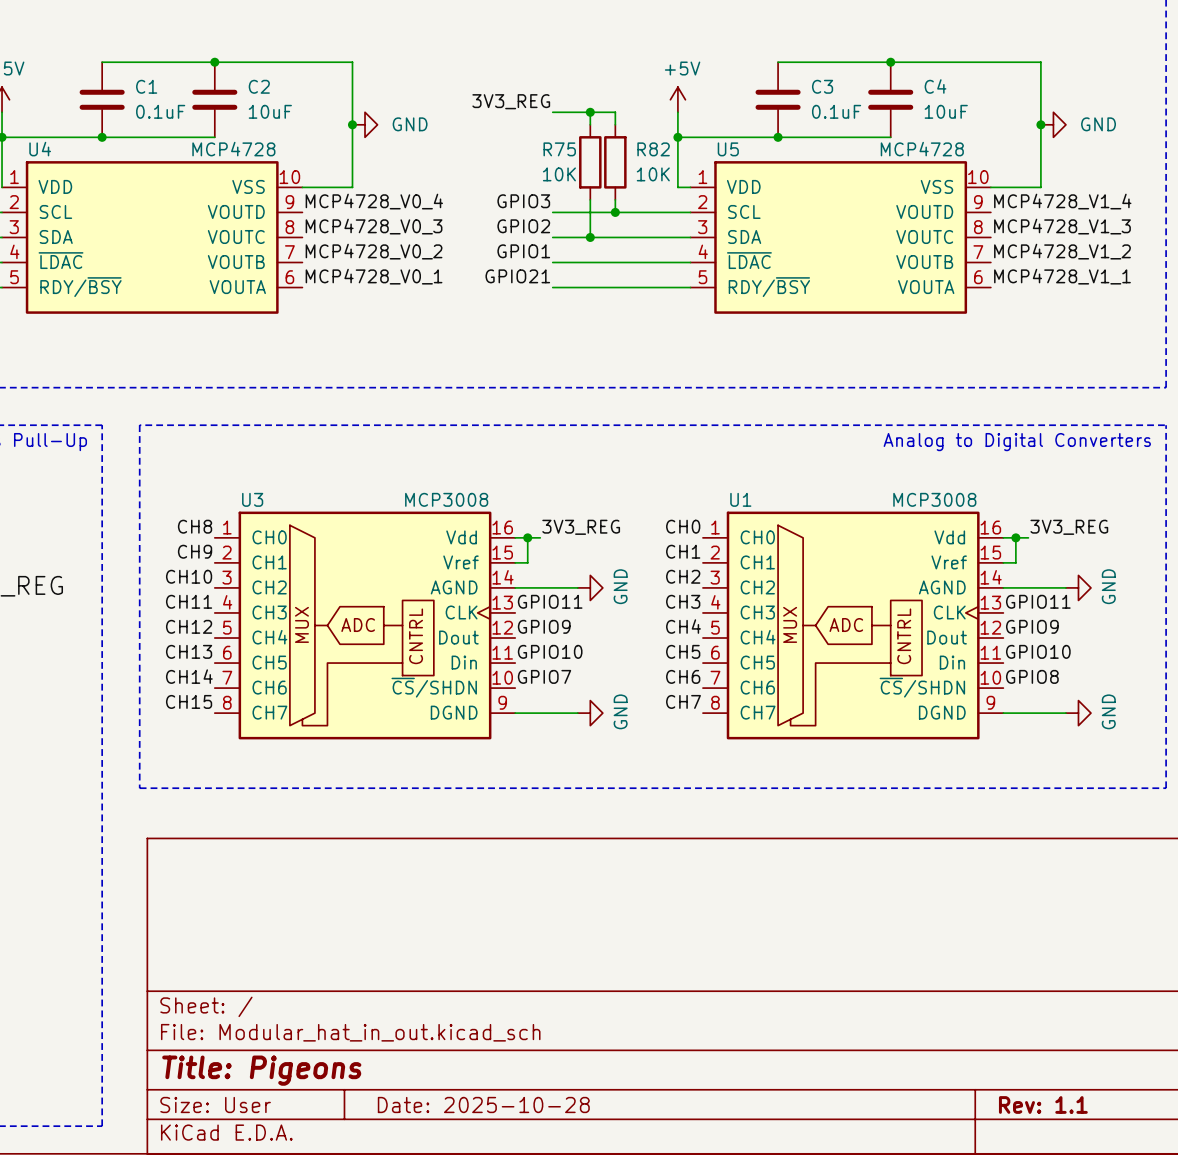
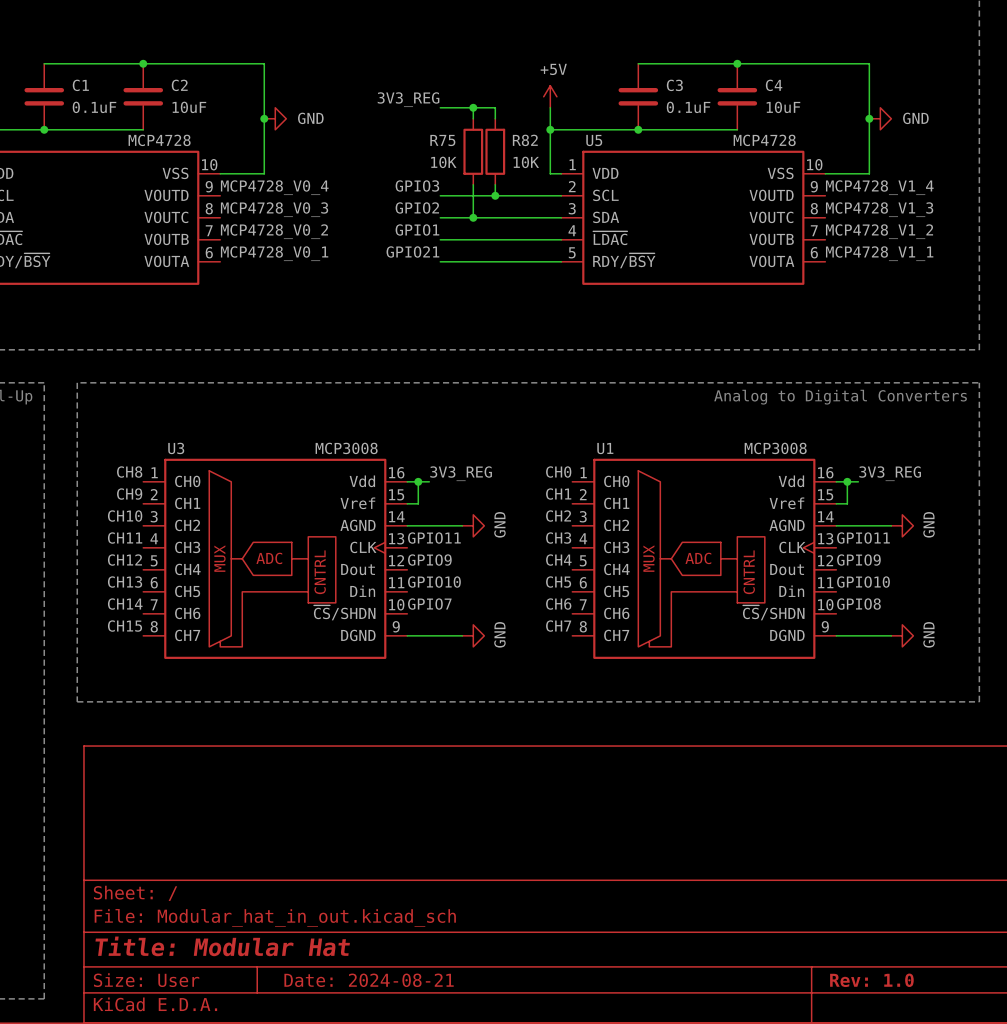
title block: Title: Pigeons (261, 1070) -> Title: Modular Hat (222, 946)
title block: Date: 2025-10-28 (483, 1104) -> Date: 2024-08-21 (369, 980)
title block: Rev: 1.1 (1043, 1104) -> Rev: 1.0 (871, 980)

